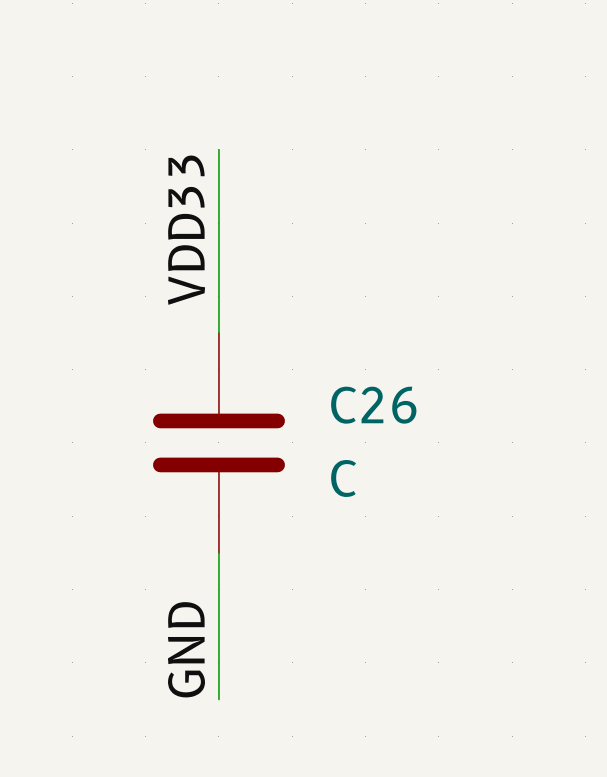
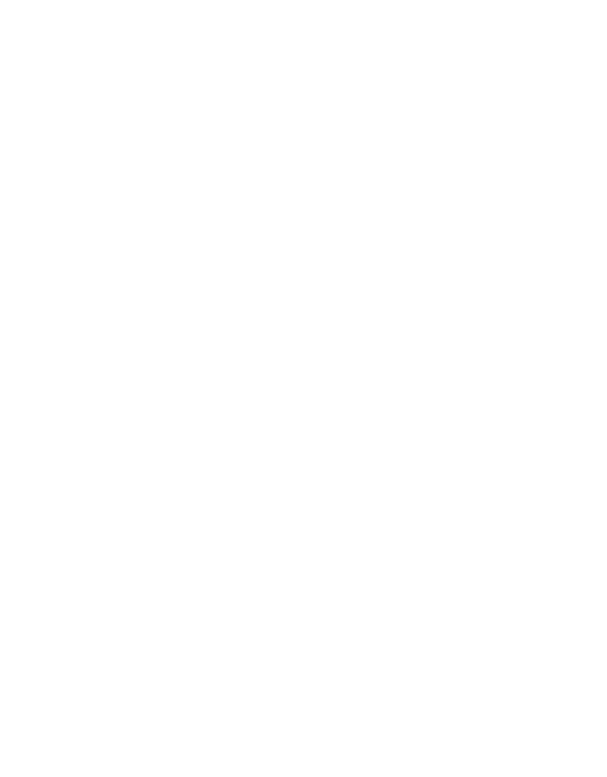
wire: (218, 149) (218, 332) -> none
label: VDD33 (186, 230) -> none
C26: C (218, 442) -> none
wire: (218, 552) (218, 699) -> none
label: GND (186, 649) -> none

